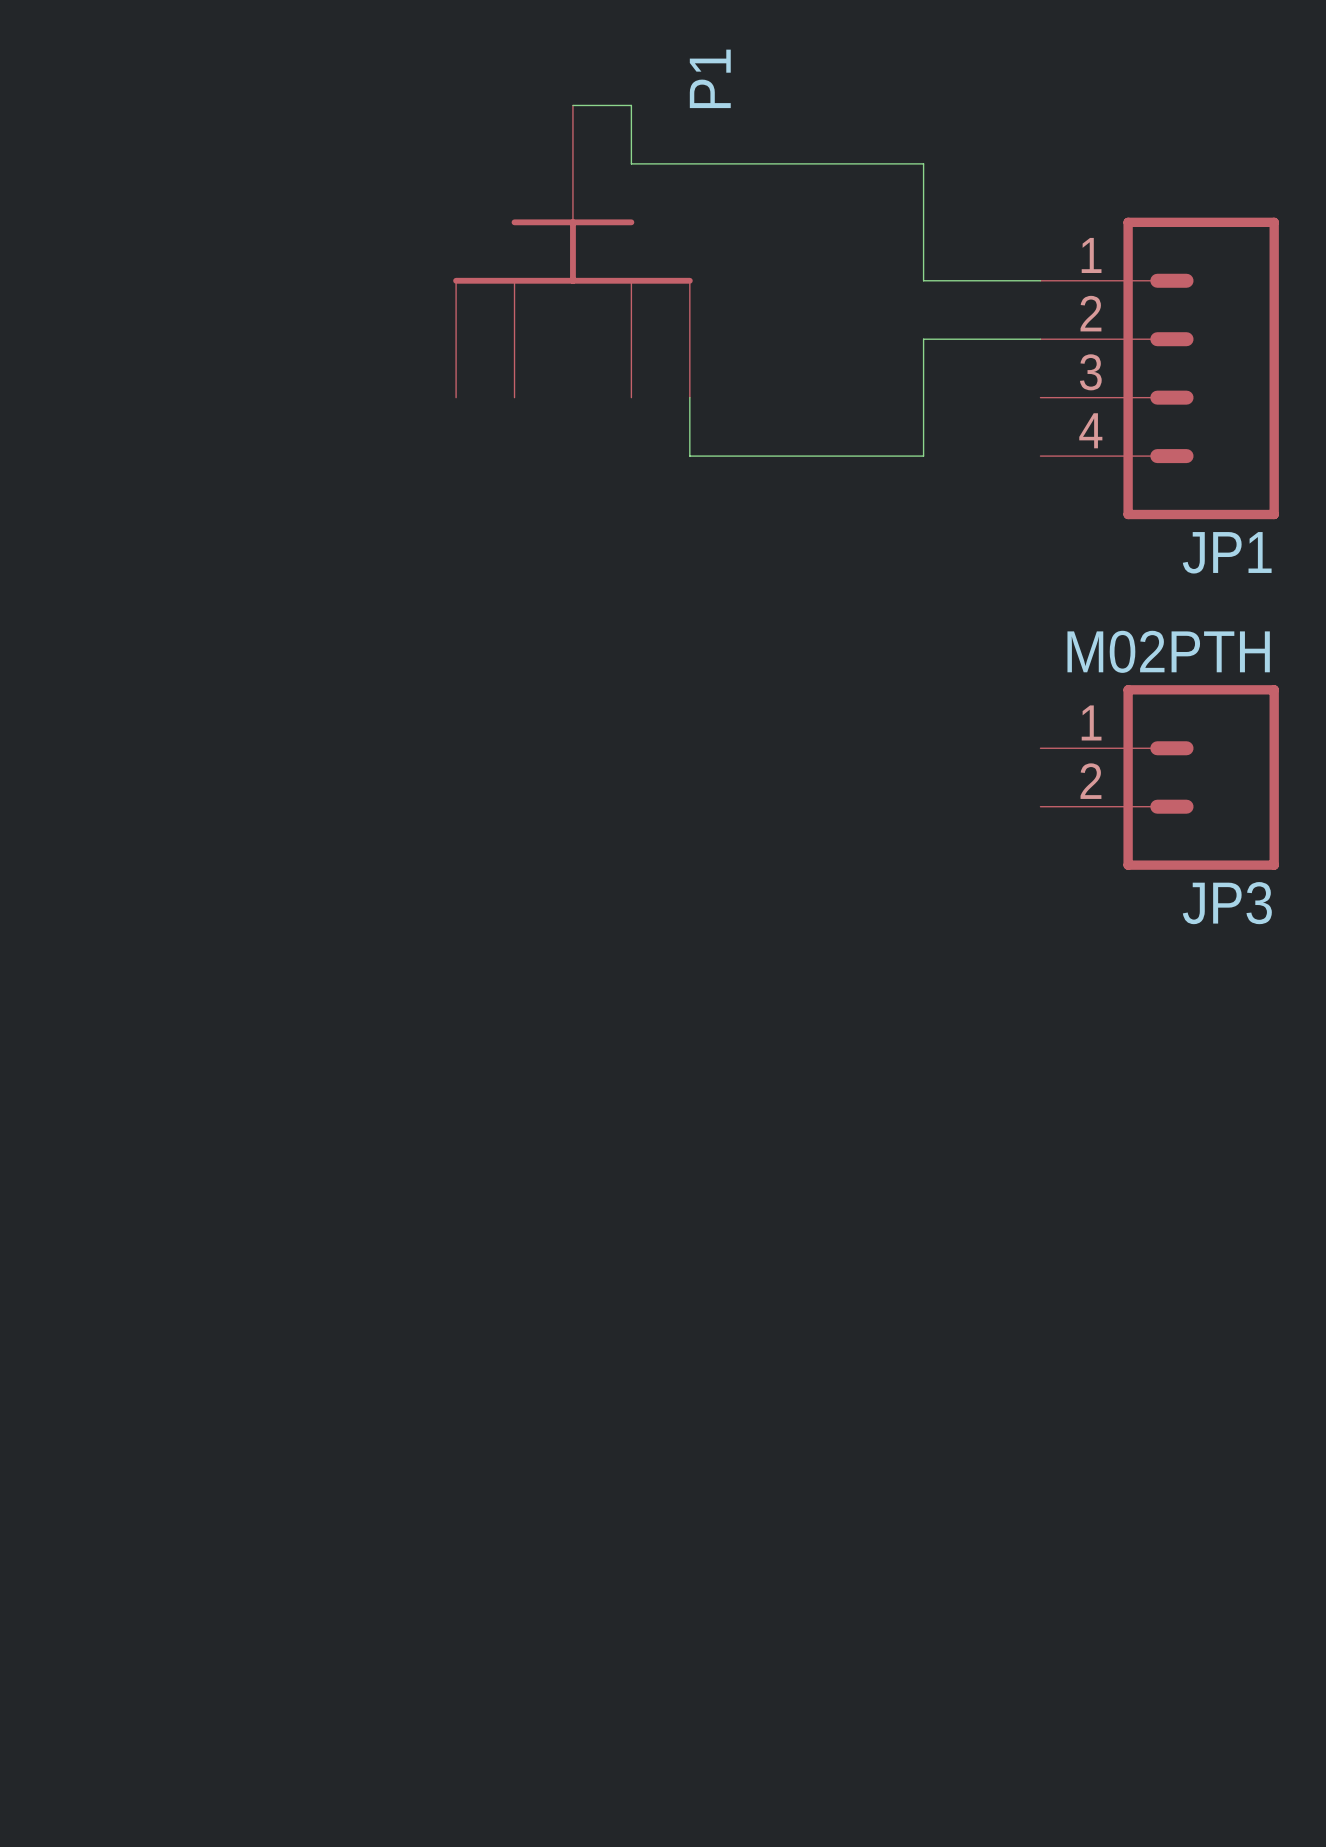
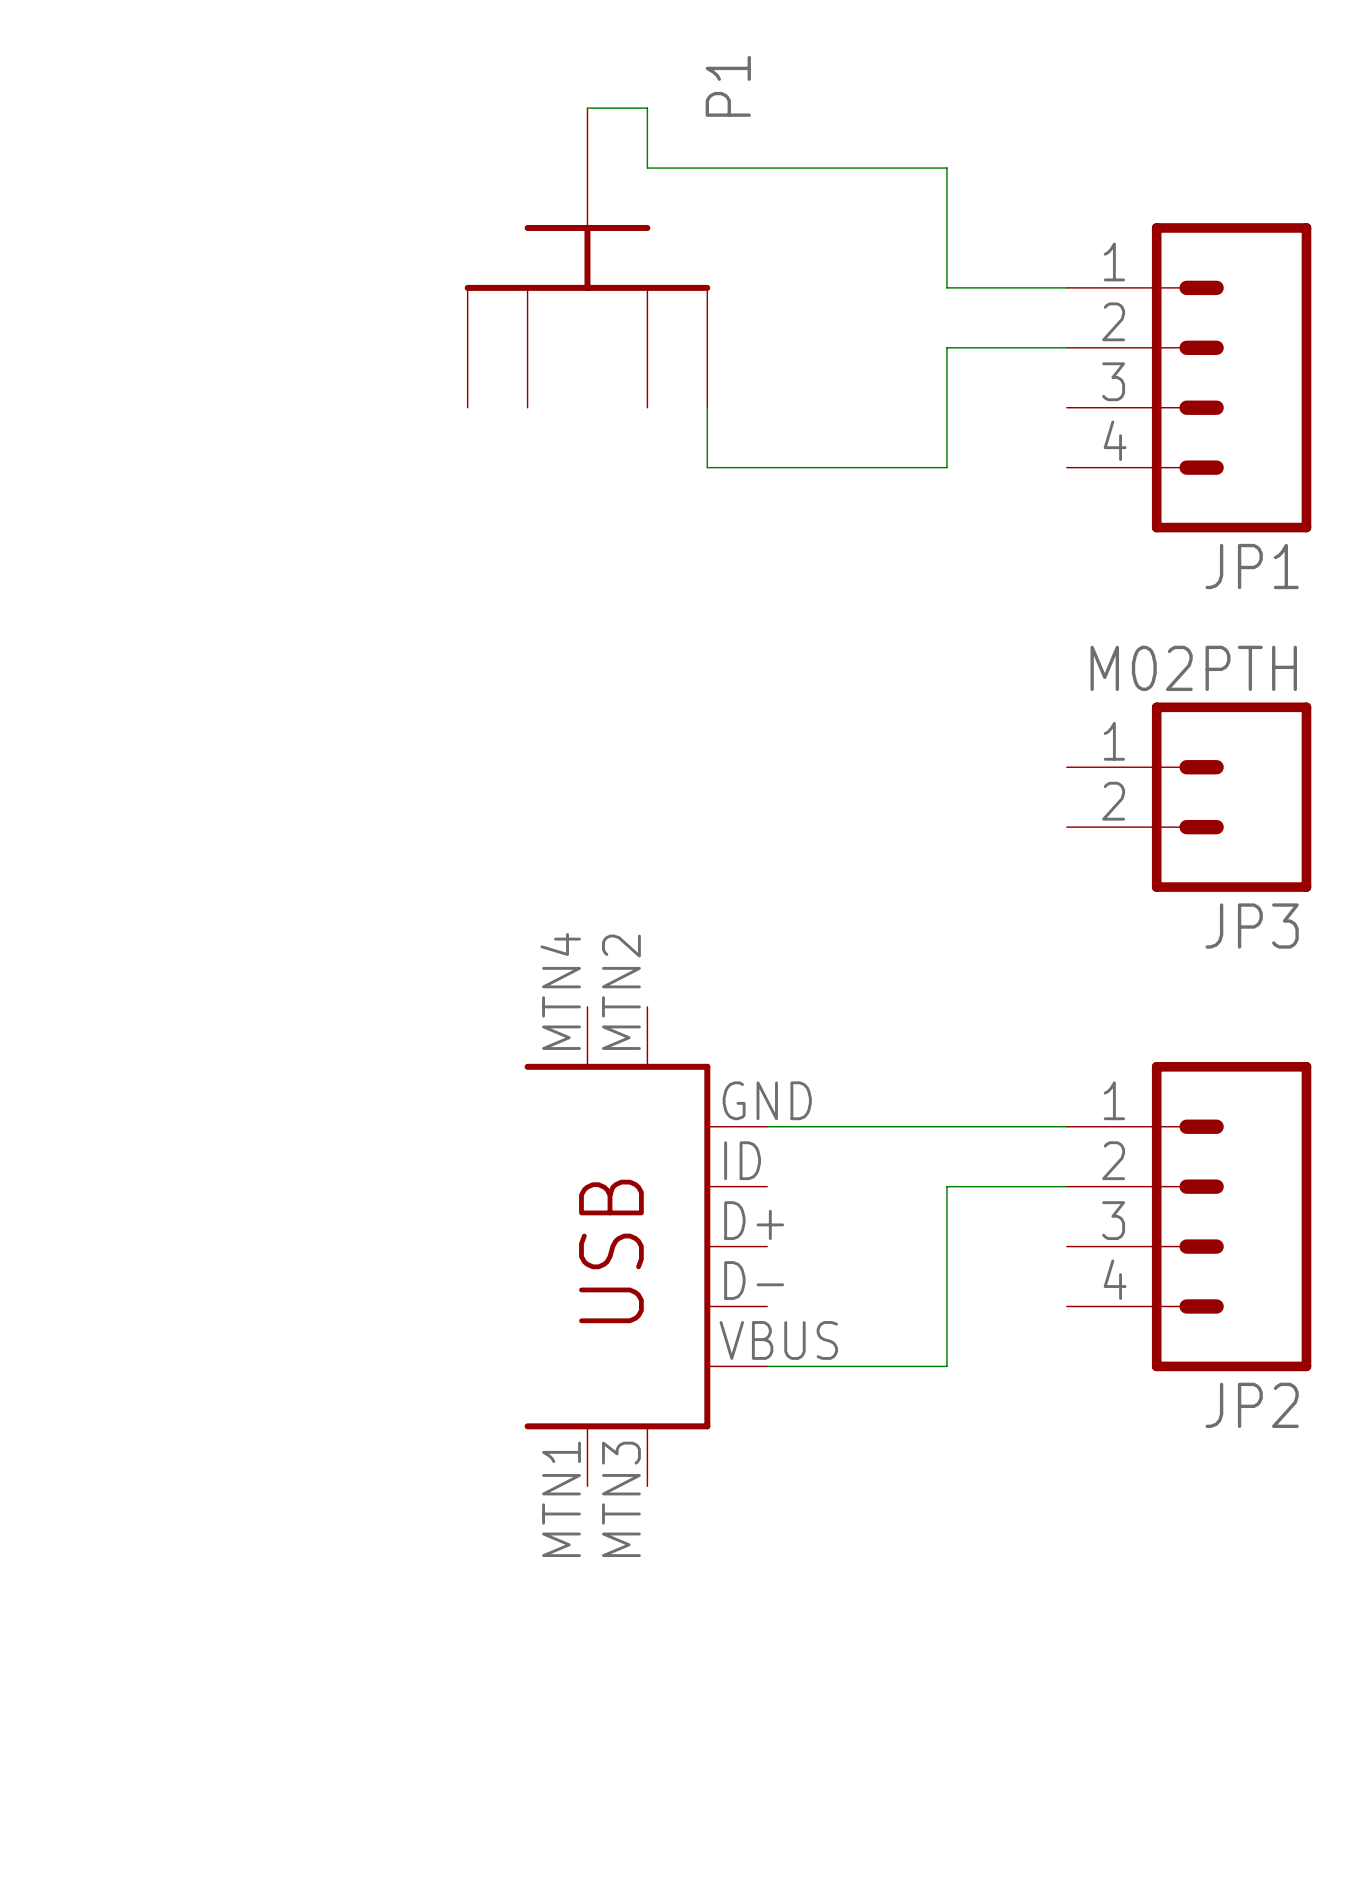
wire: none -> (767, 1126) (1066, 1126)
wire: none -> (1066, 1186) (946, 1186) (946, 1366) (767, 1366)
JP2: none -> (1189, 1216)
part: none -> (645, 1246)

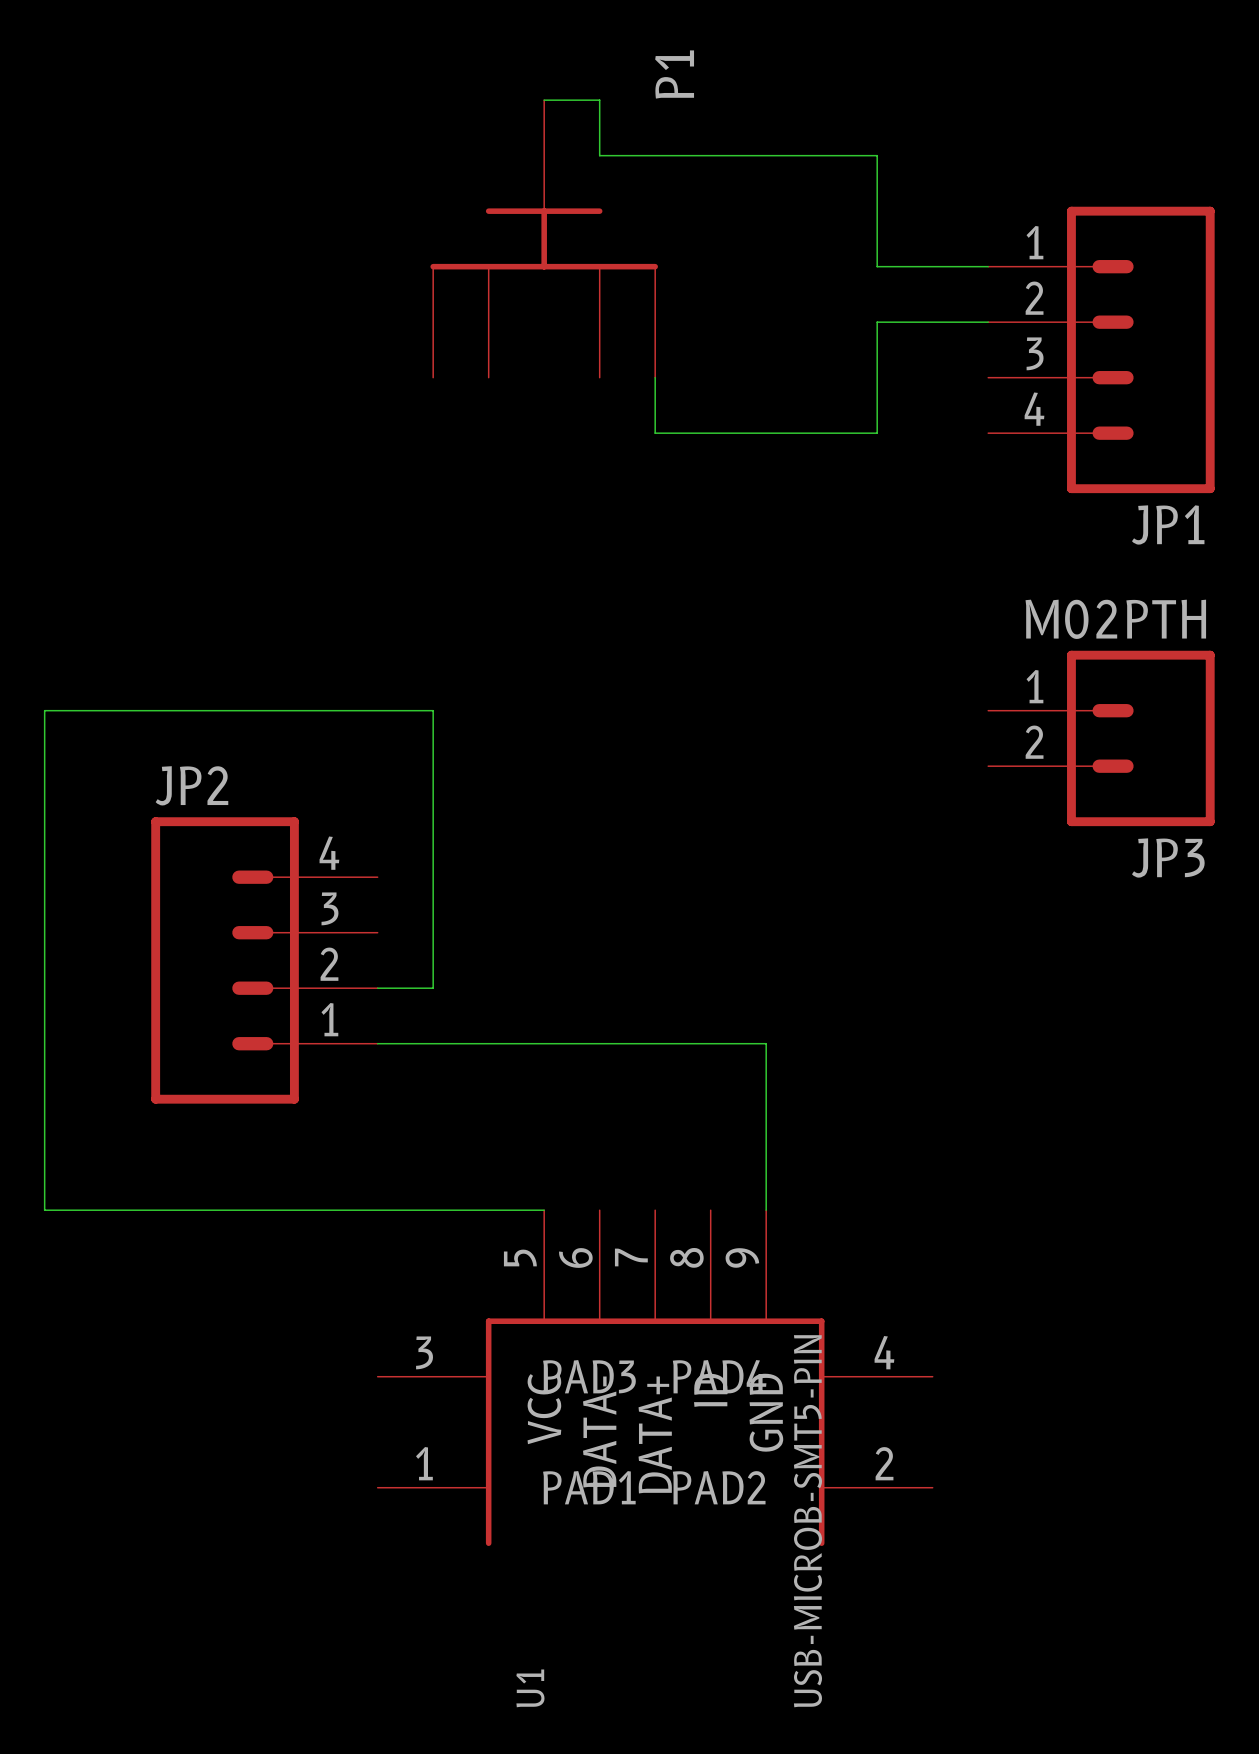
wire: none -> (377, 988) (433, 988) (433, 710) (44, 710) (44, 1210) (544, 1210)
wire: none -> (377, 1043) (710, 1043)
wire: (827, 1126) (1066, 1126) -> (766, 1043) (766, 1210)
wire: (1066, 1186) (946, 1186) (946, 1366) (767, 1366) -> none
JP2 position: (1189, 1216) -> (264, 960)
JP2 rotation: 0° (1231, 1216) -> 180° (225, 960)
part: (645, 1246) -> none
U1: none -> USB-MICROB-SMT5-PIN (655, 1378)

